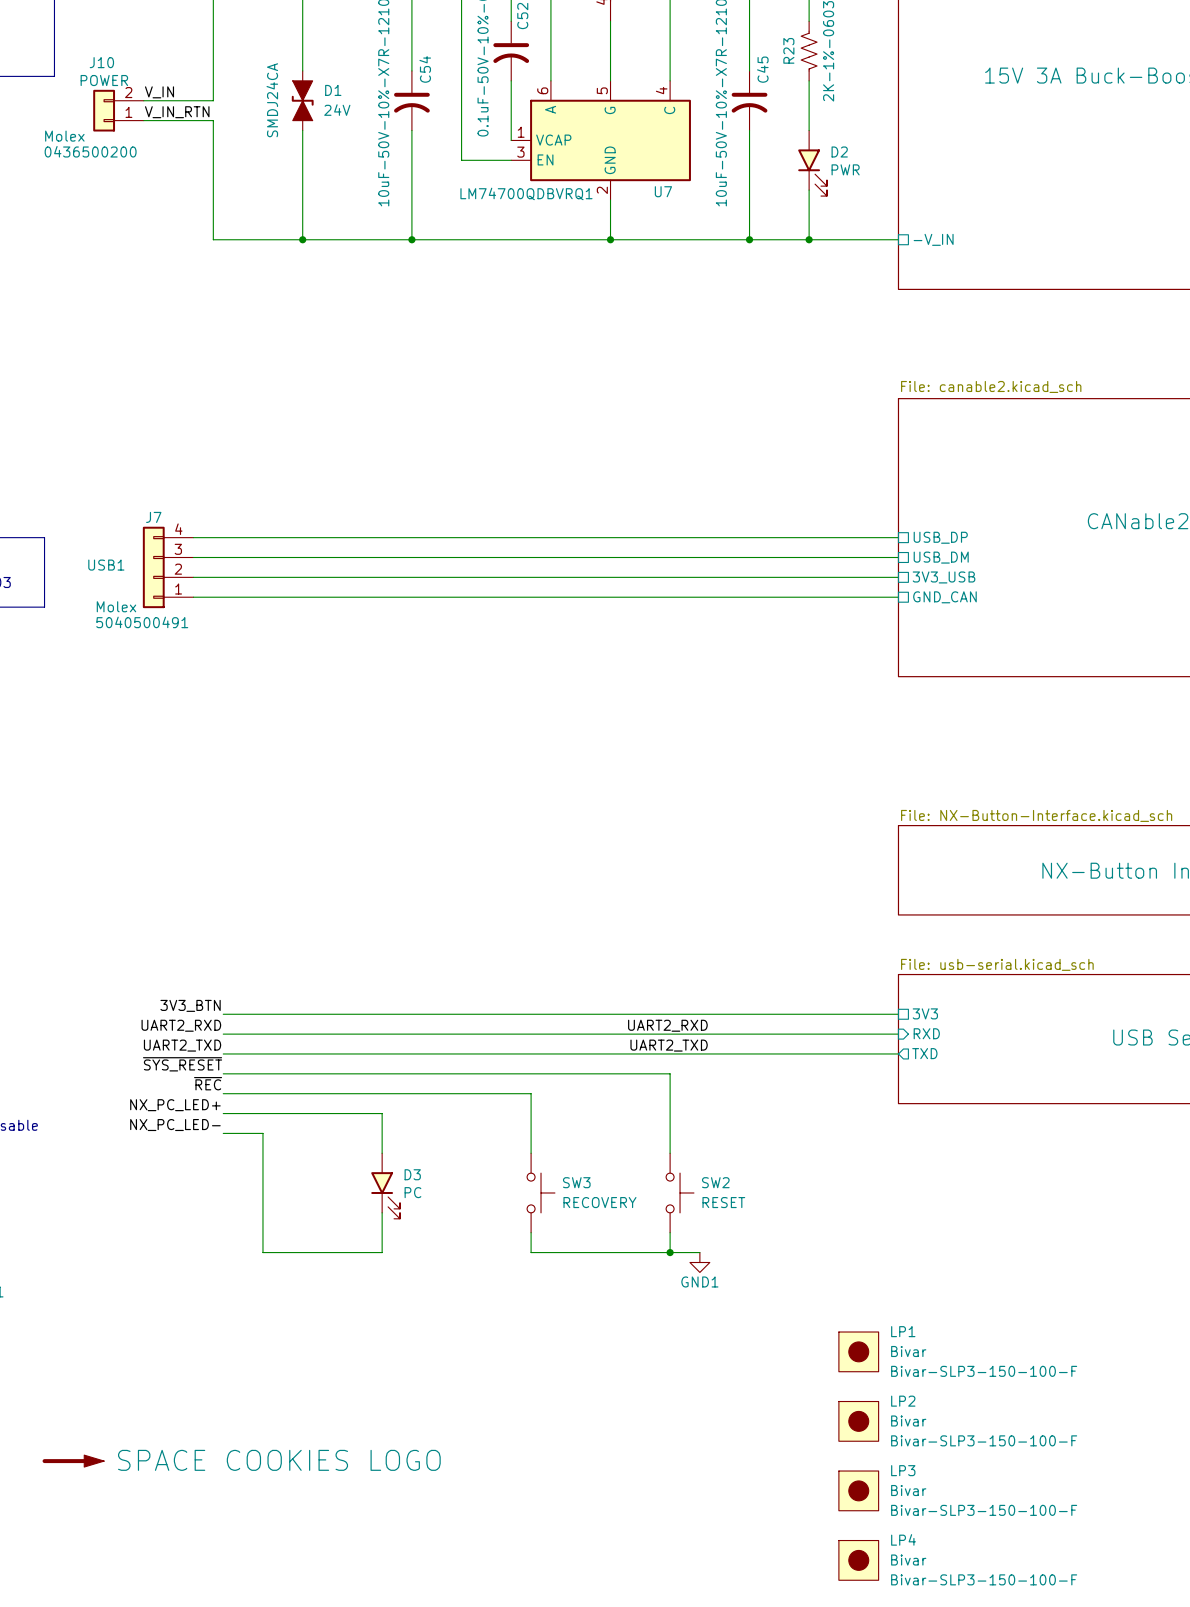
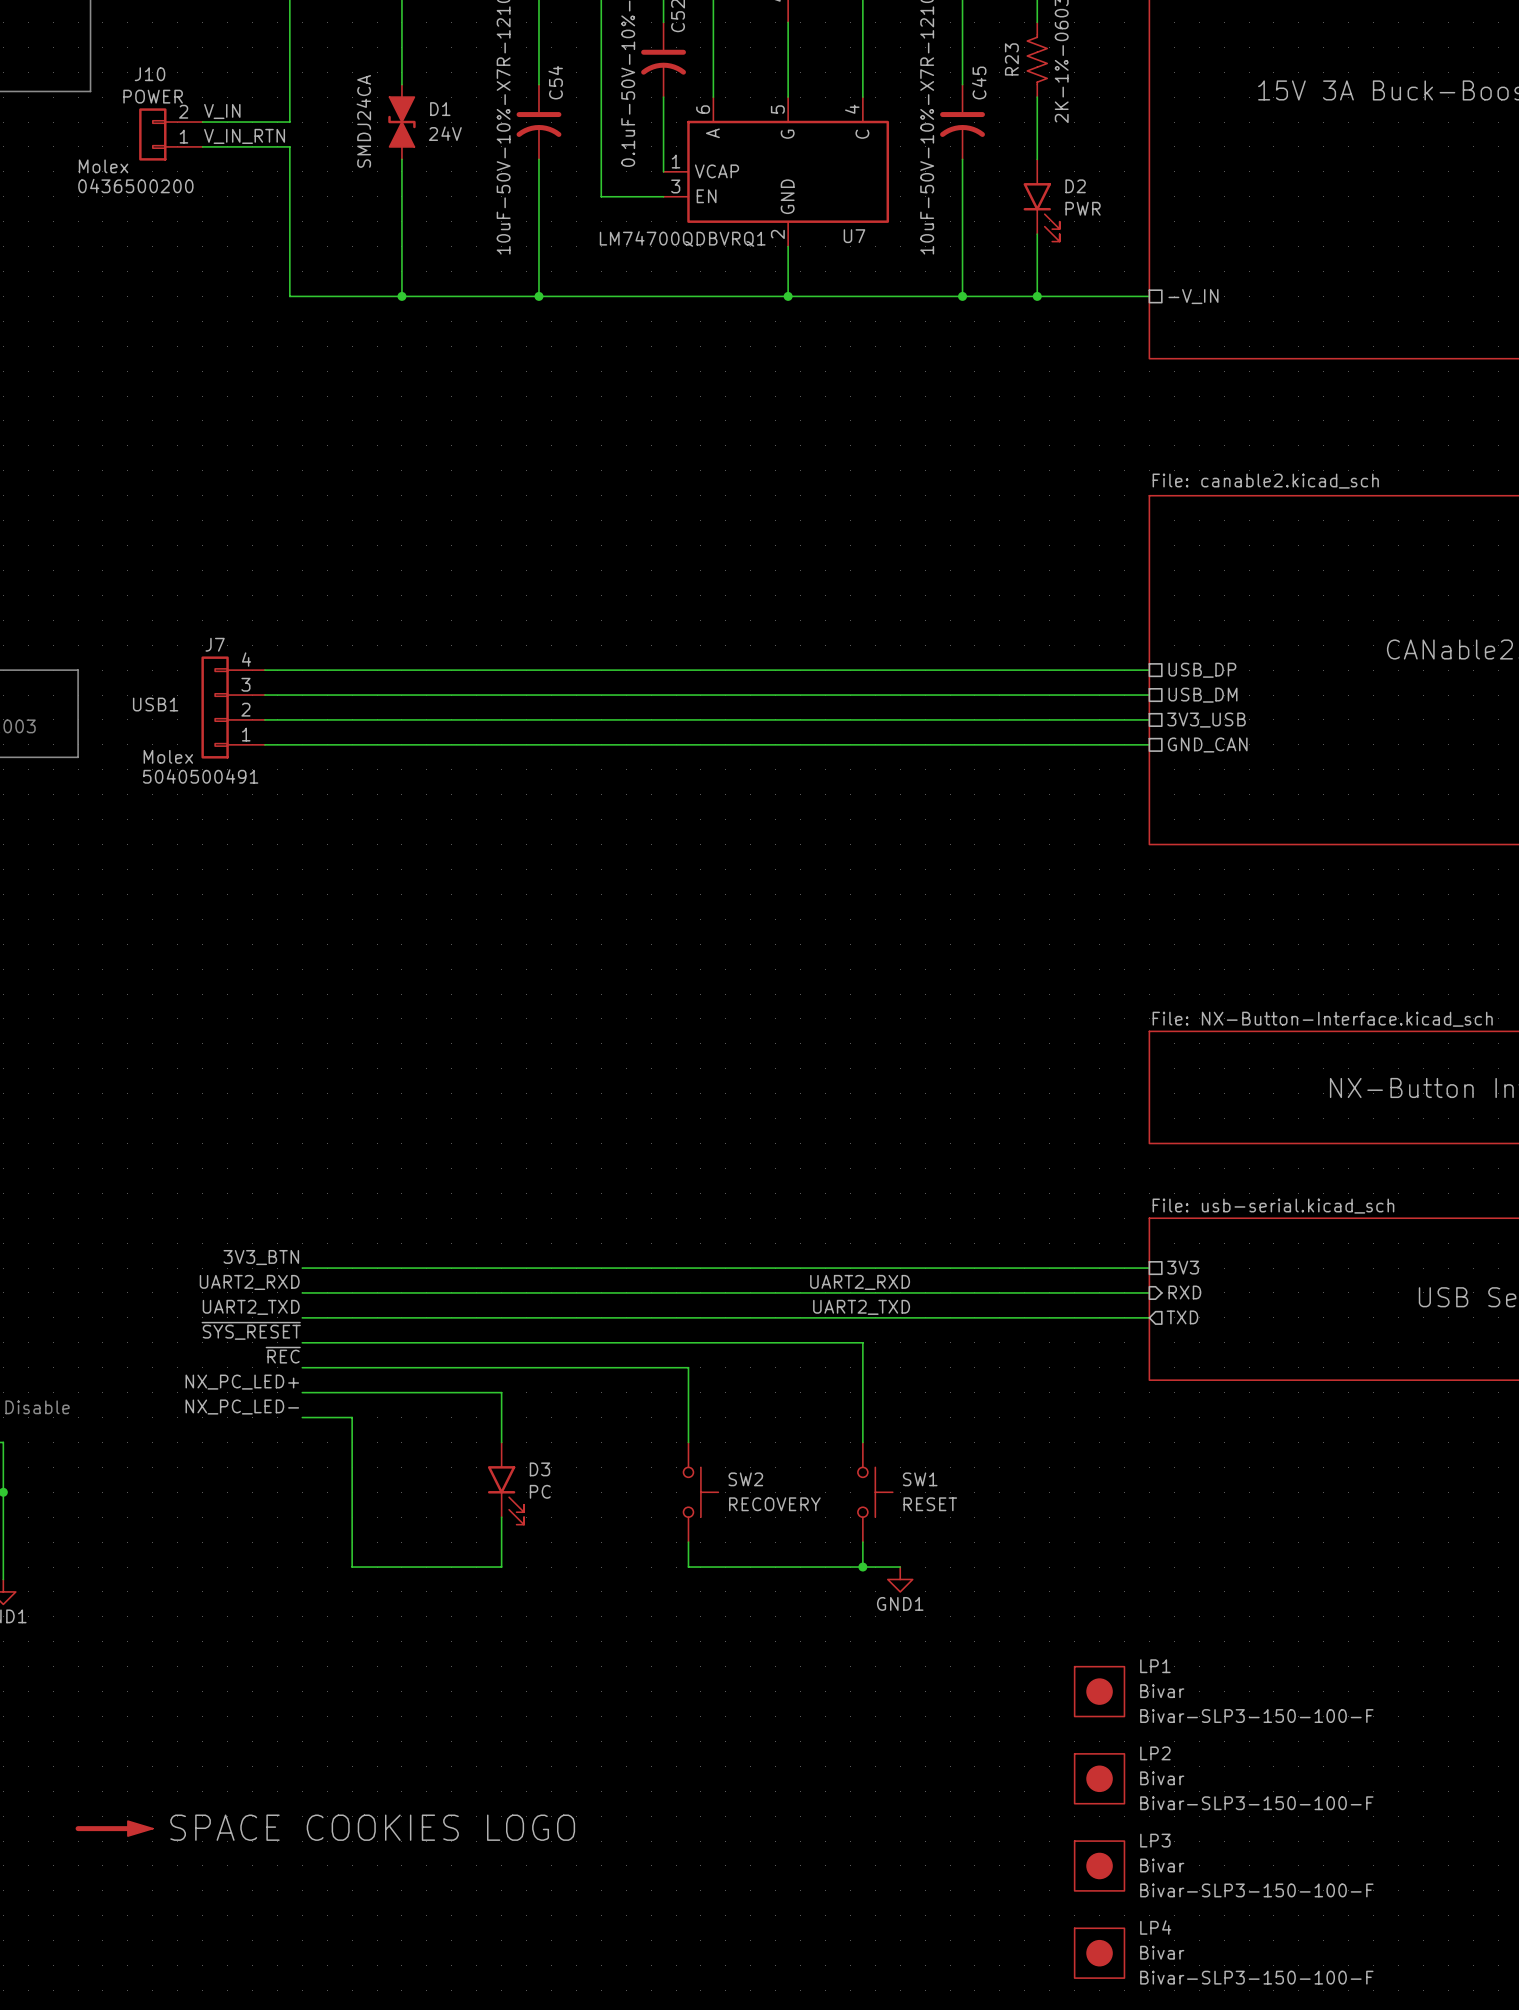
SW3 name: SW3 (576, 1182) -> SW2 (745, 1479)
SW2 name: SW2 (715, 1182) -> SW1 (920, 1479)

